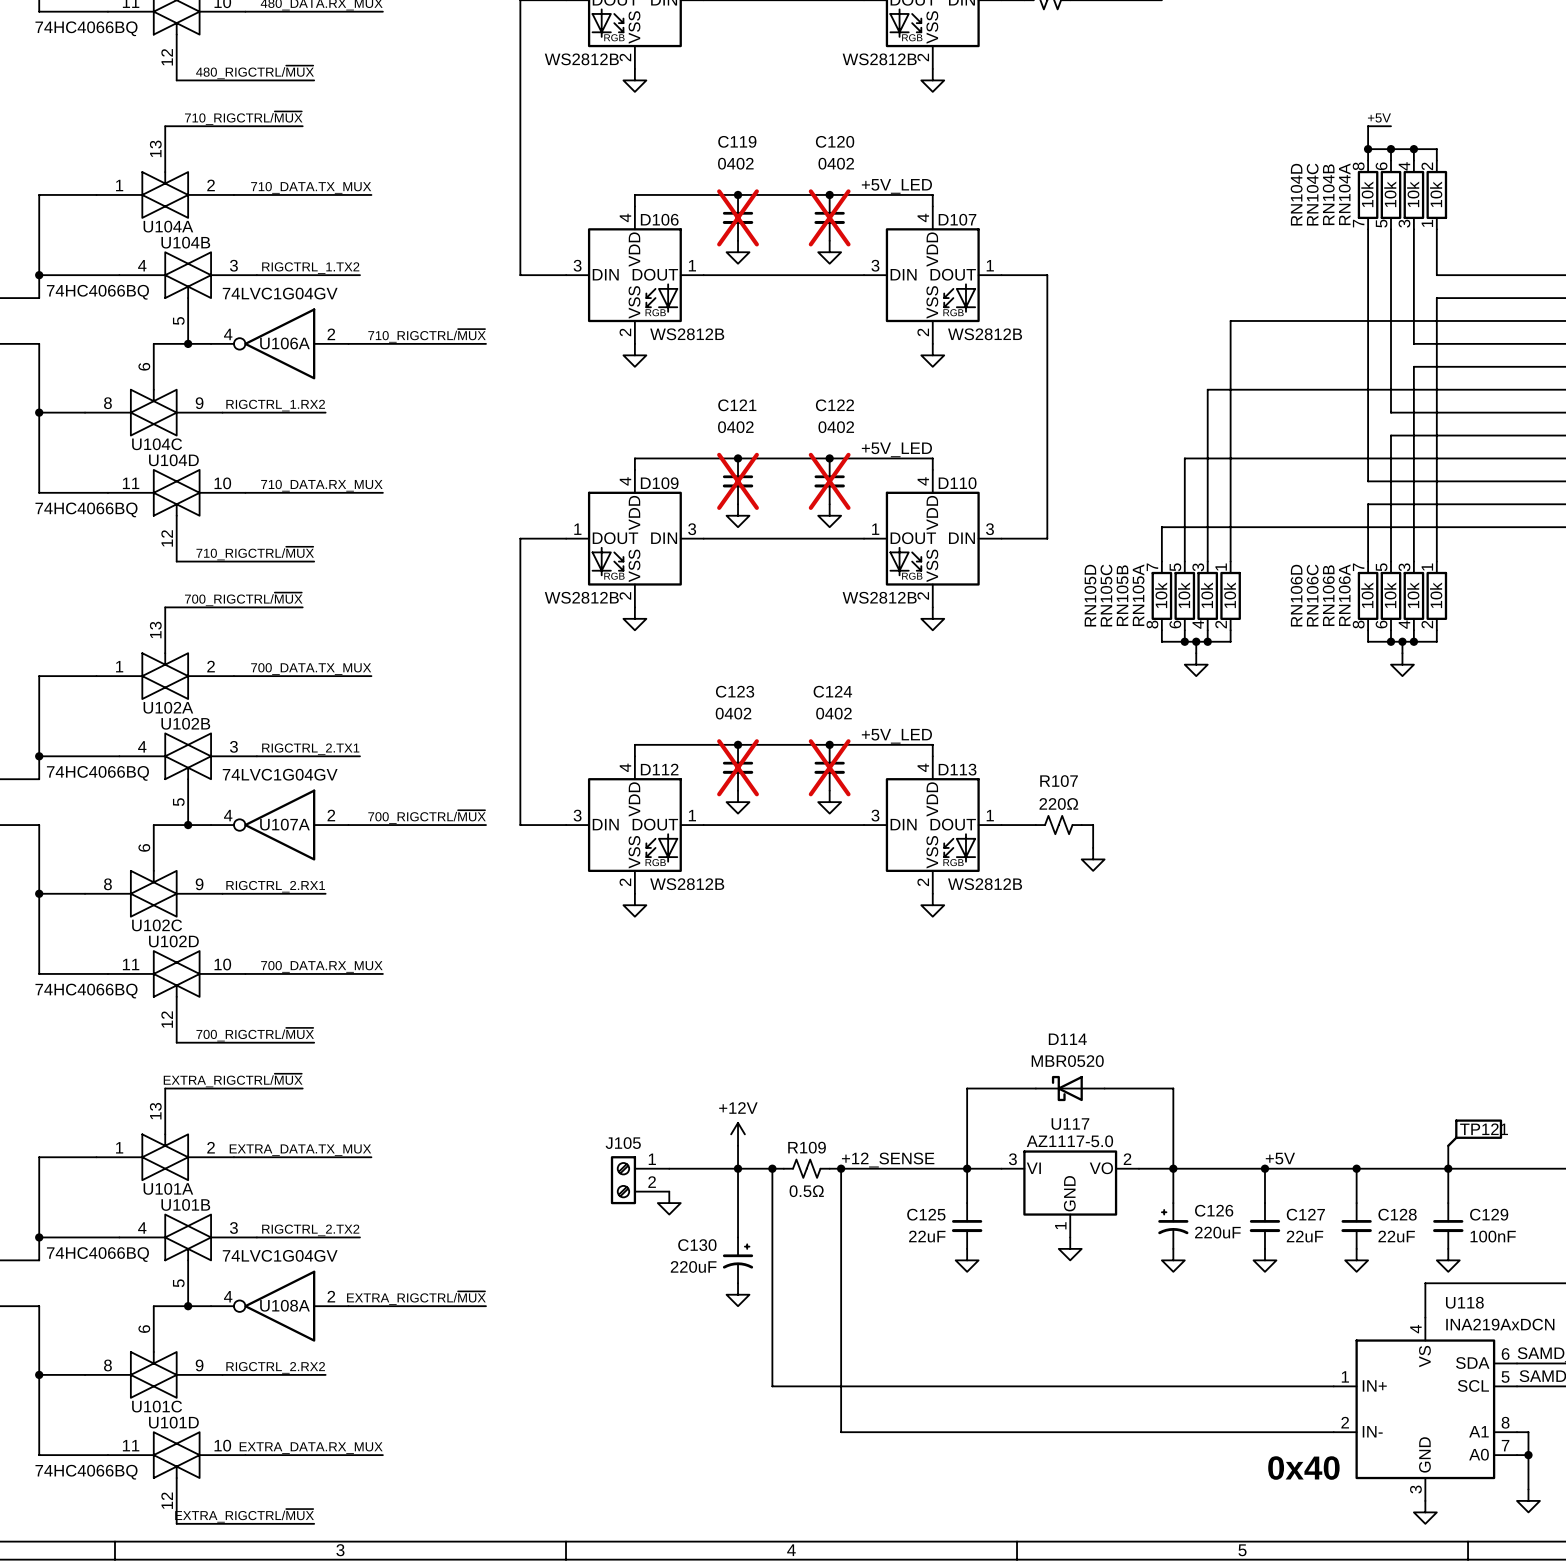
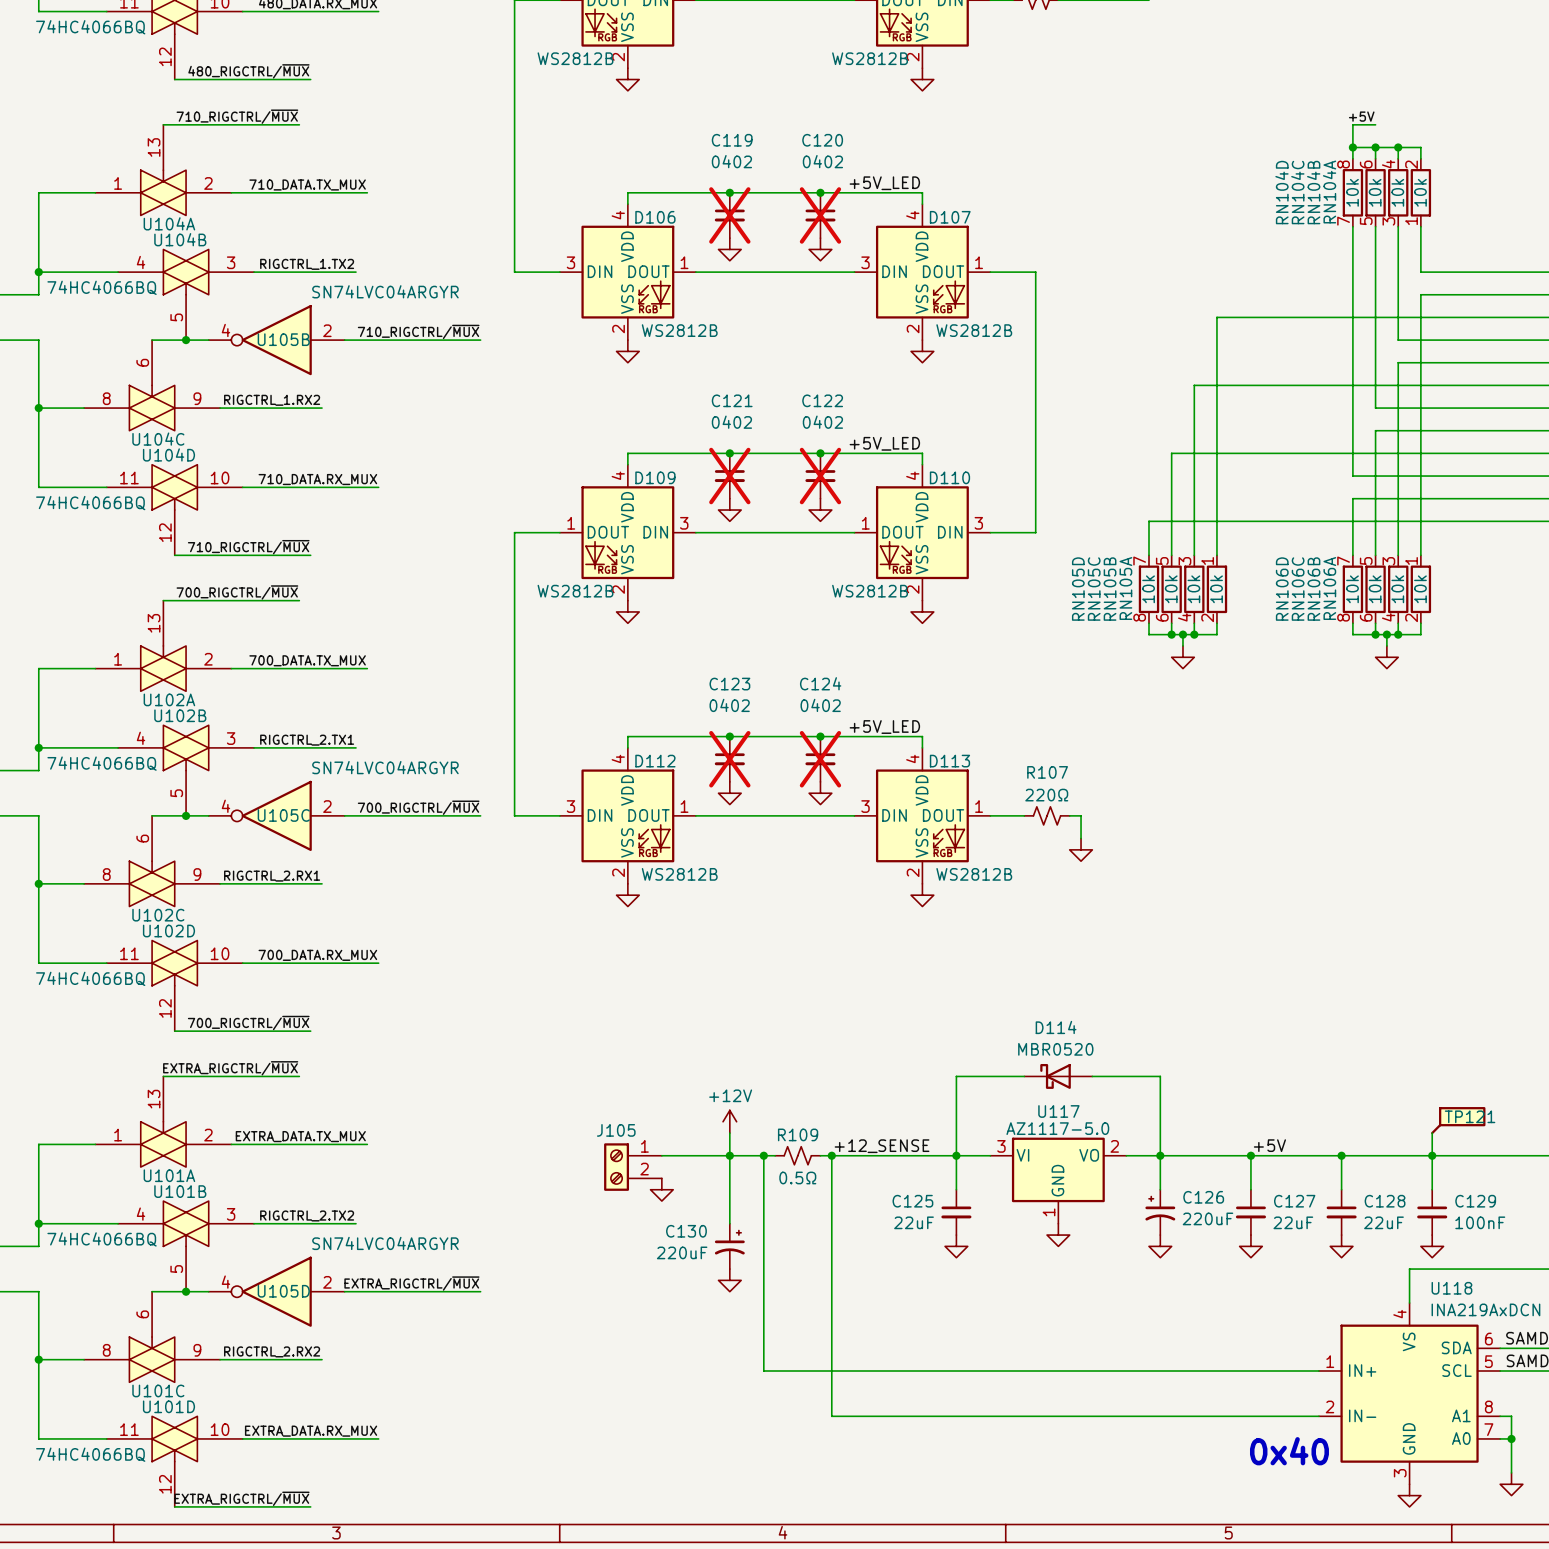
U106A value: 74LVC1G04GV (280, 293) -> SN74LVC04ARGYR (385, 291)
U106A name: U106A (284, 343) -> U105B (283, 339)
U107A value: 74LVC1G04GV (280, 774) -> SN74LVC04ARGYR (385, 767)
U107A name: U107A (284, 824) -> U105C (283, 815)
U108A value: 74LVC1G04GV (280, 1255) -> SN74LVC04ARGYR (385, 1243)
U108A name: U108A (284, 1305) -> U105D (283, 1291)

